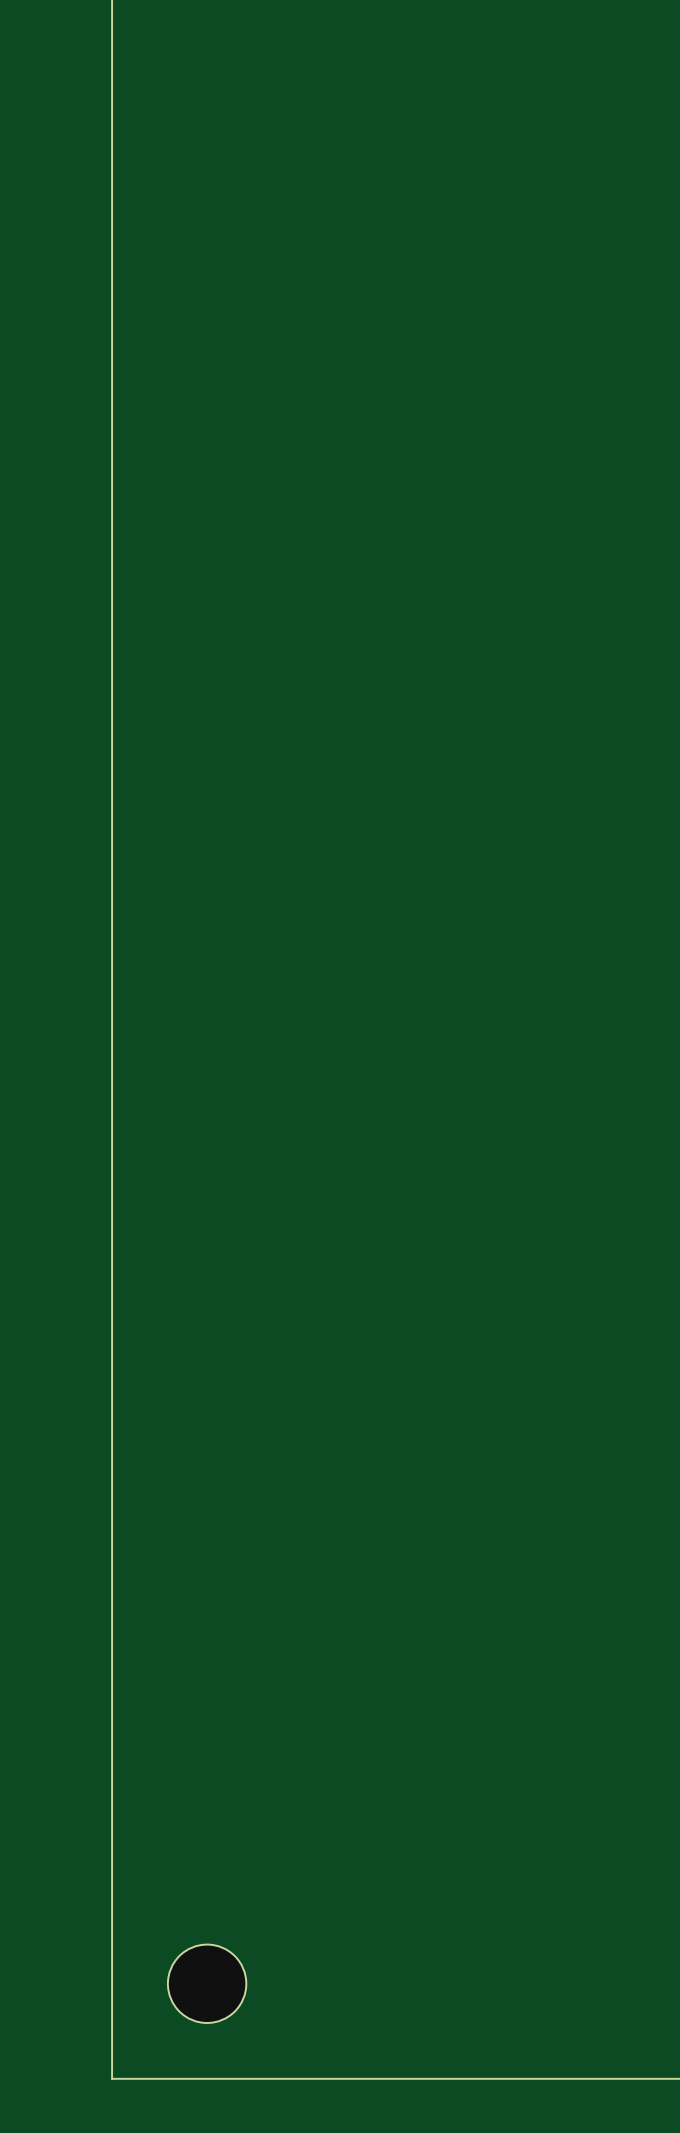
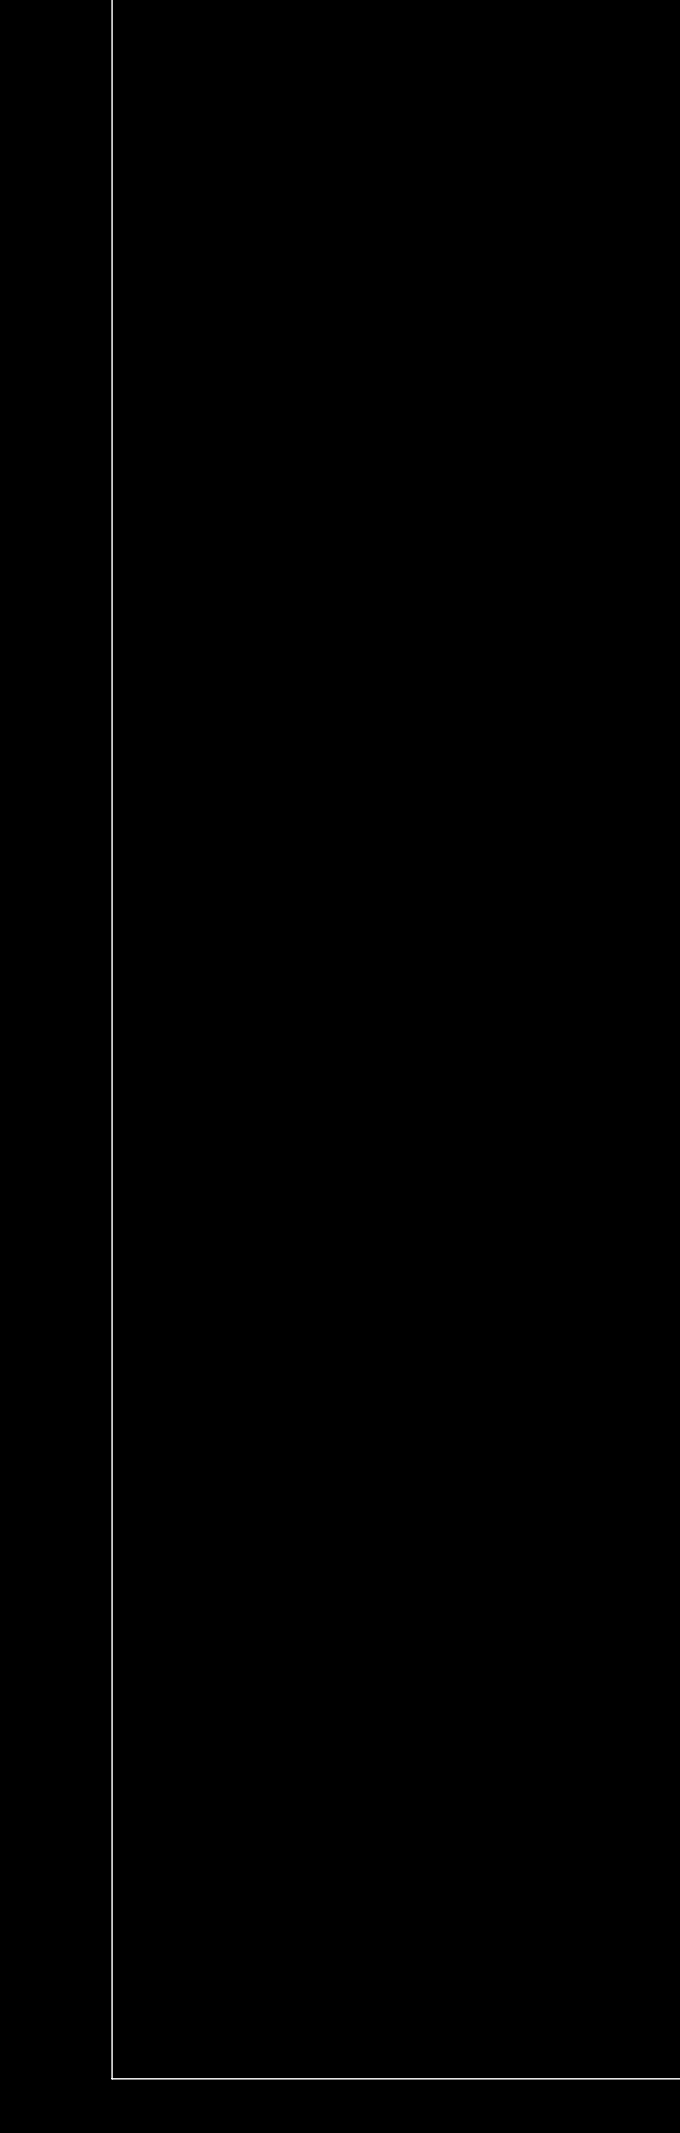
part: (207, 1983) -> none

